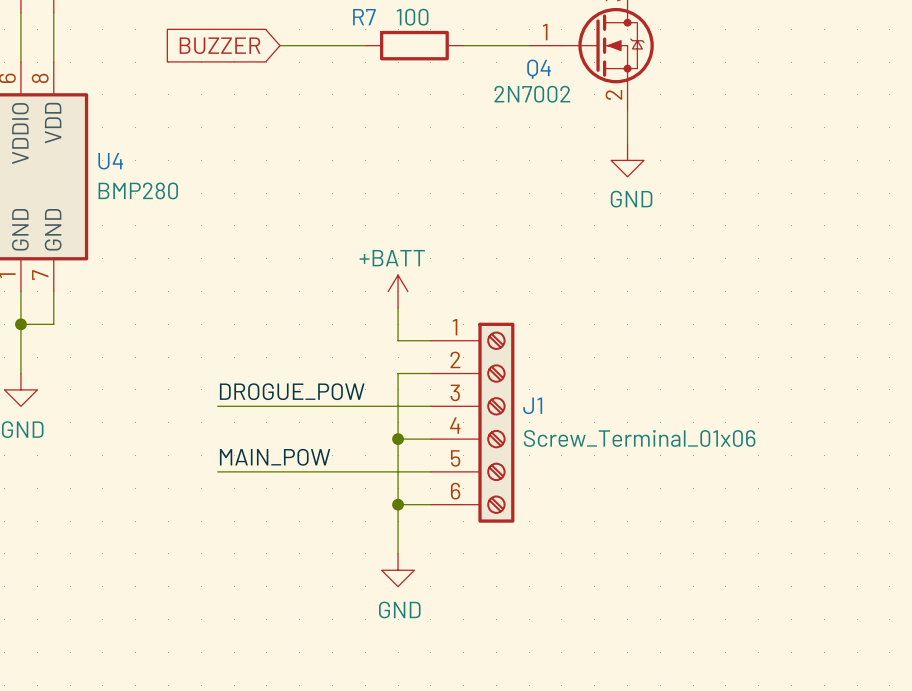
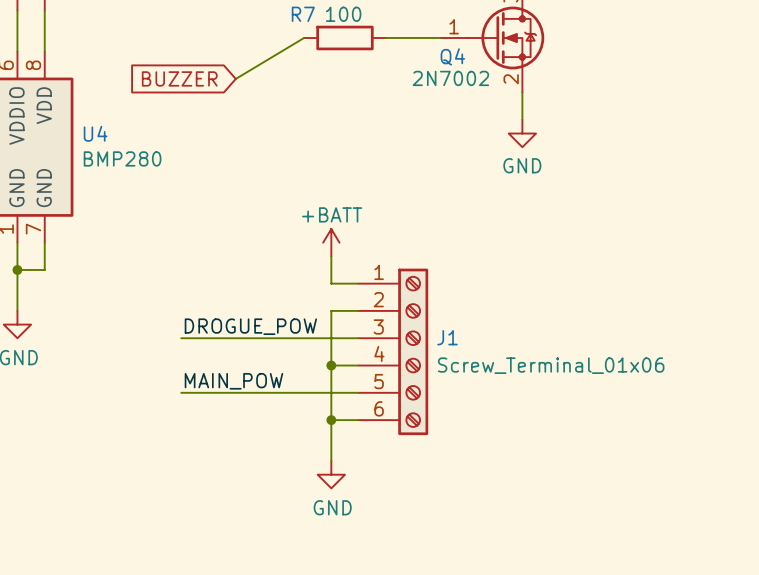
global label position: BUZZER (220, 45) -> BUZZER (179, 78)
wire: (279, 45) (365, 45) -> (235, 78) (304, 37)

